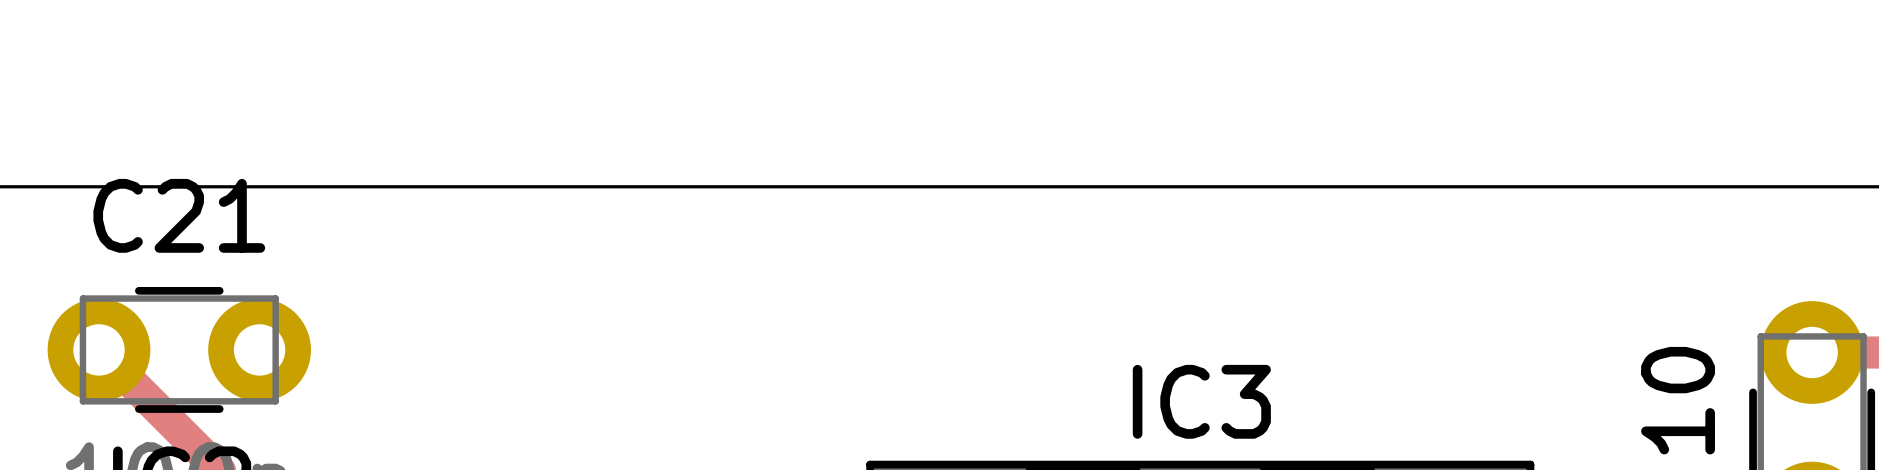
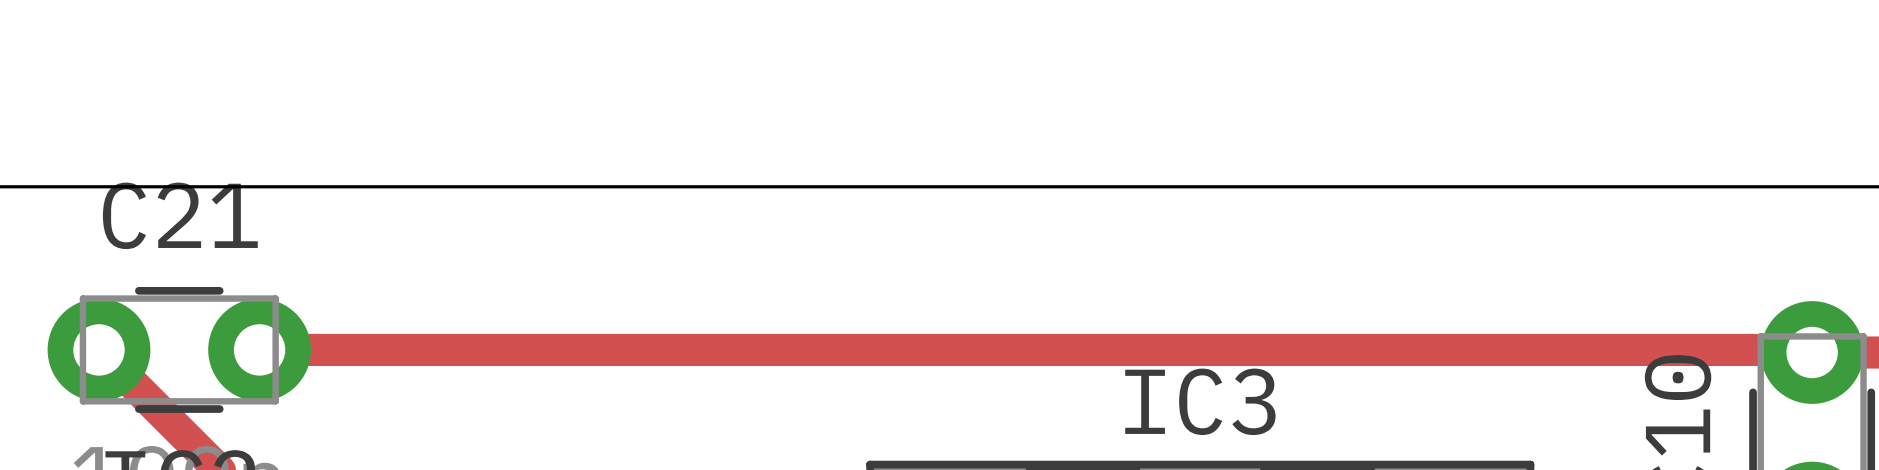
track: none -> (259, 349) (1809, 349) (1812, 352)

